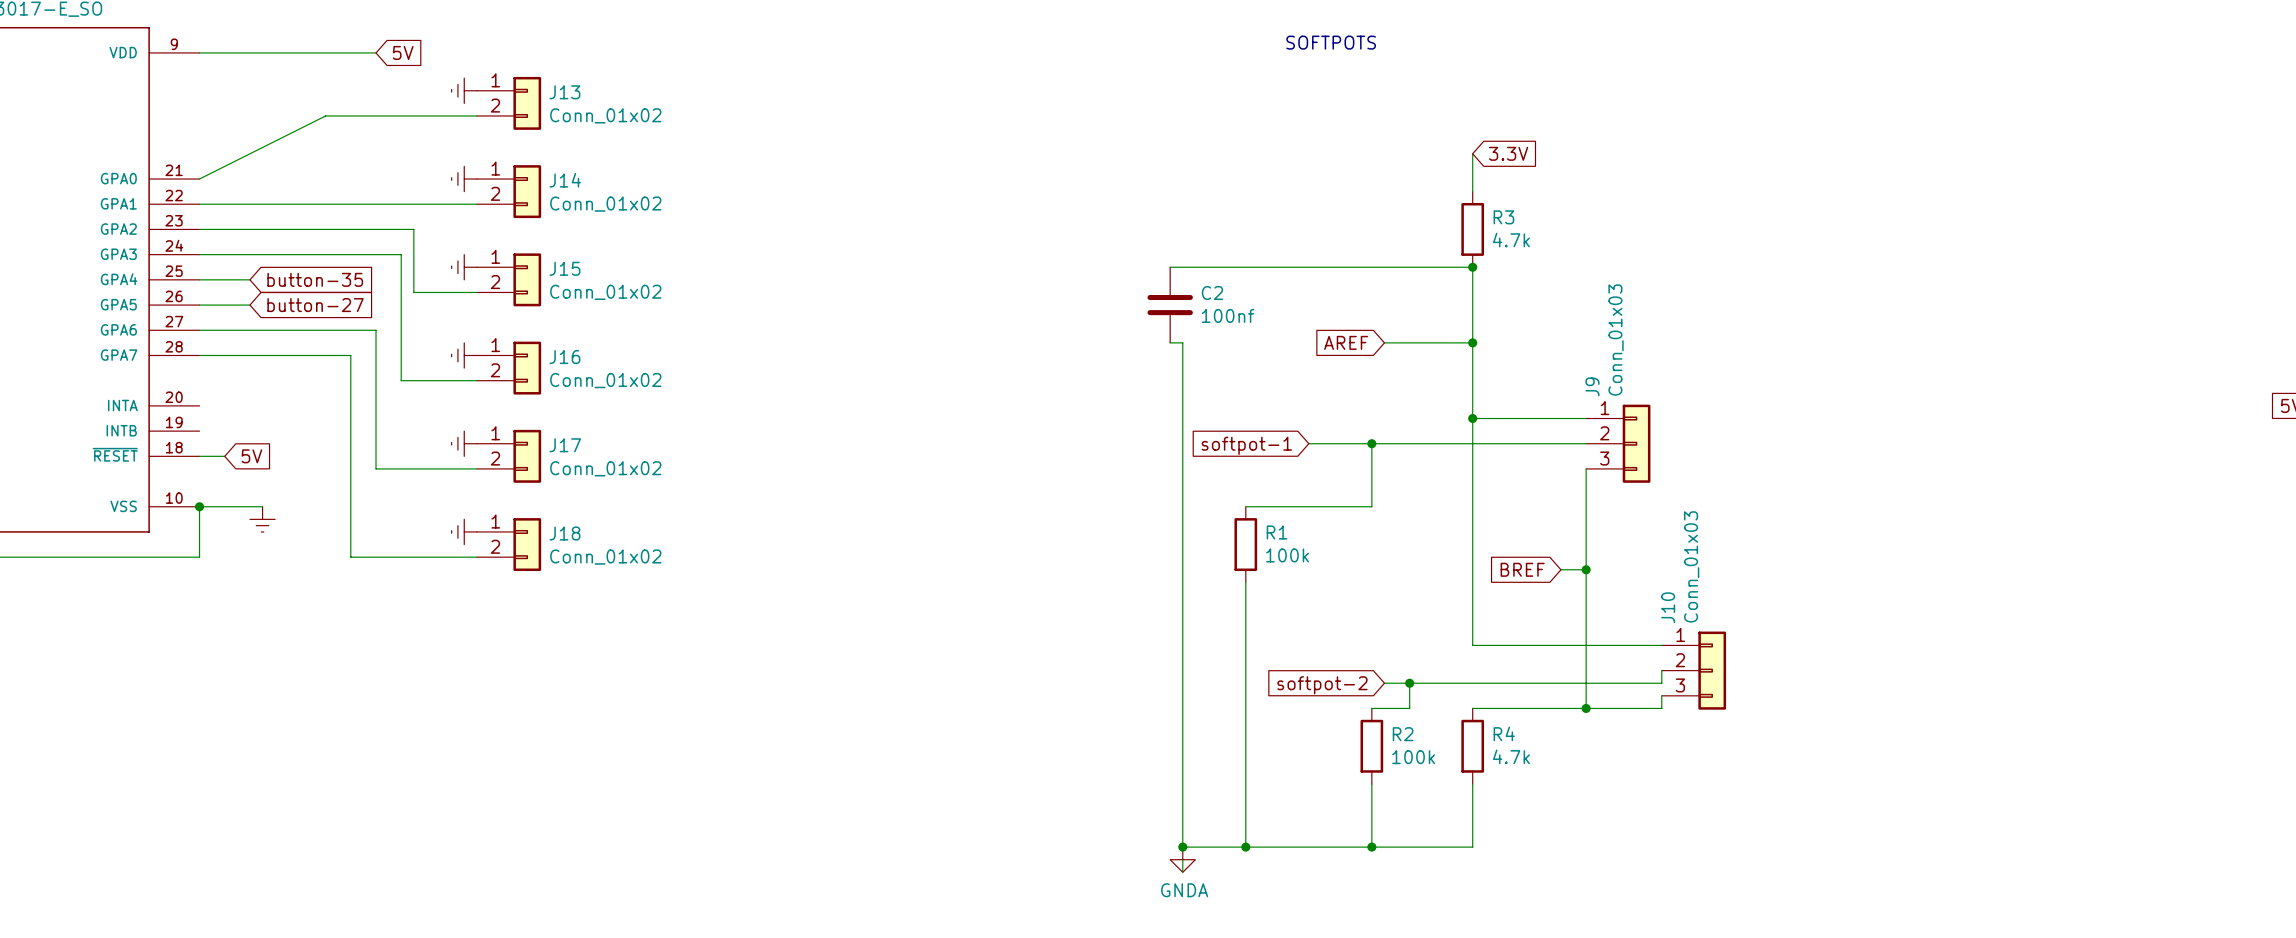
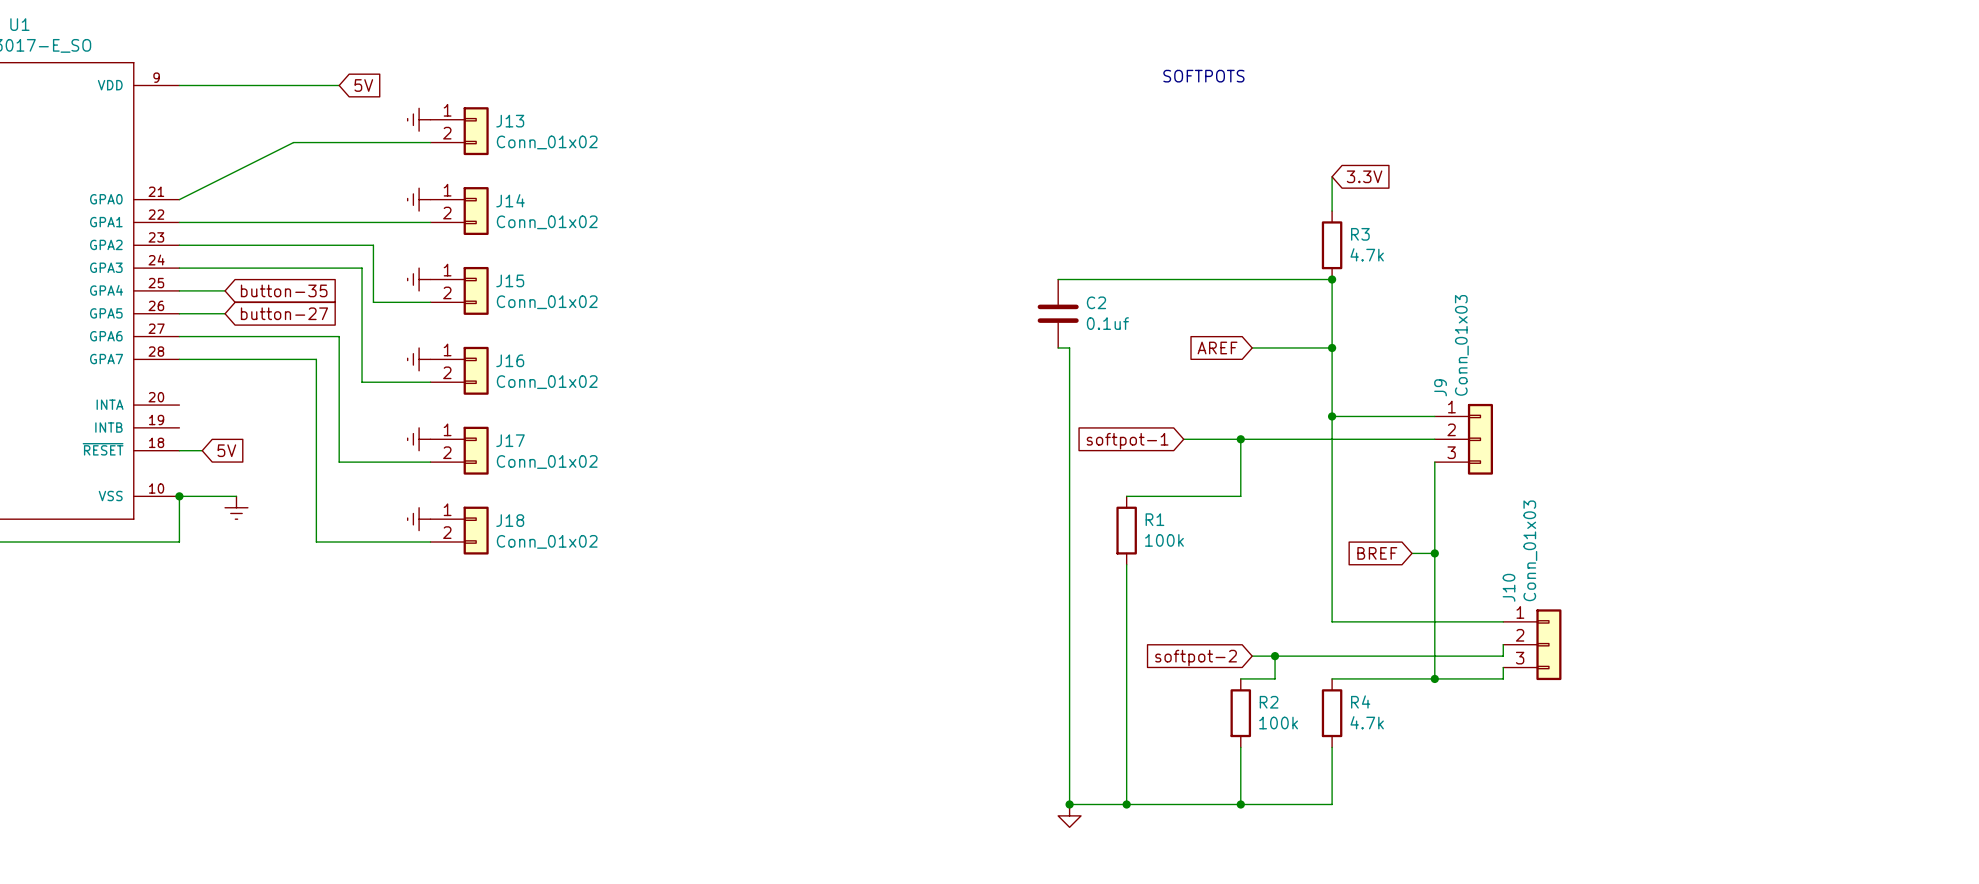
C2 value: 100nf (1228, 315) -> 0.1uf (1107, 323)
wire: (1182, 859) (1182, 872) -> none
power symbol text: GNDA (1184, 890) -> none

